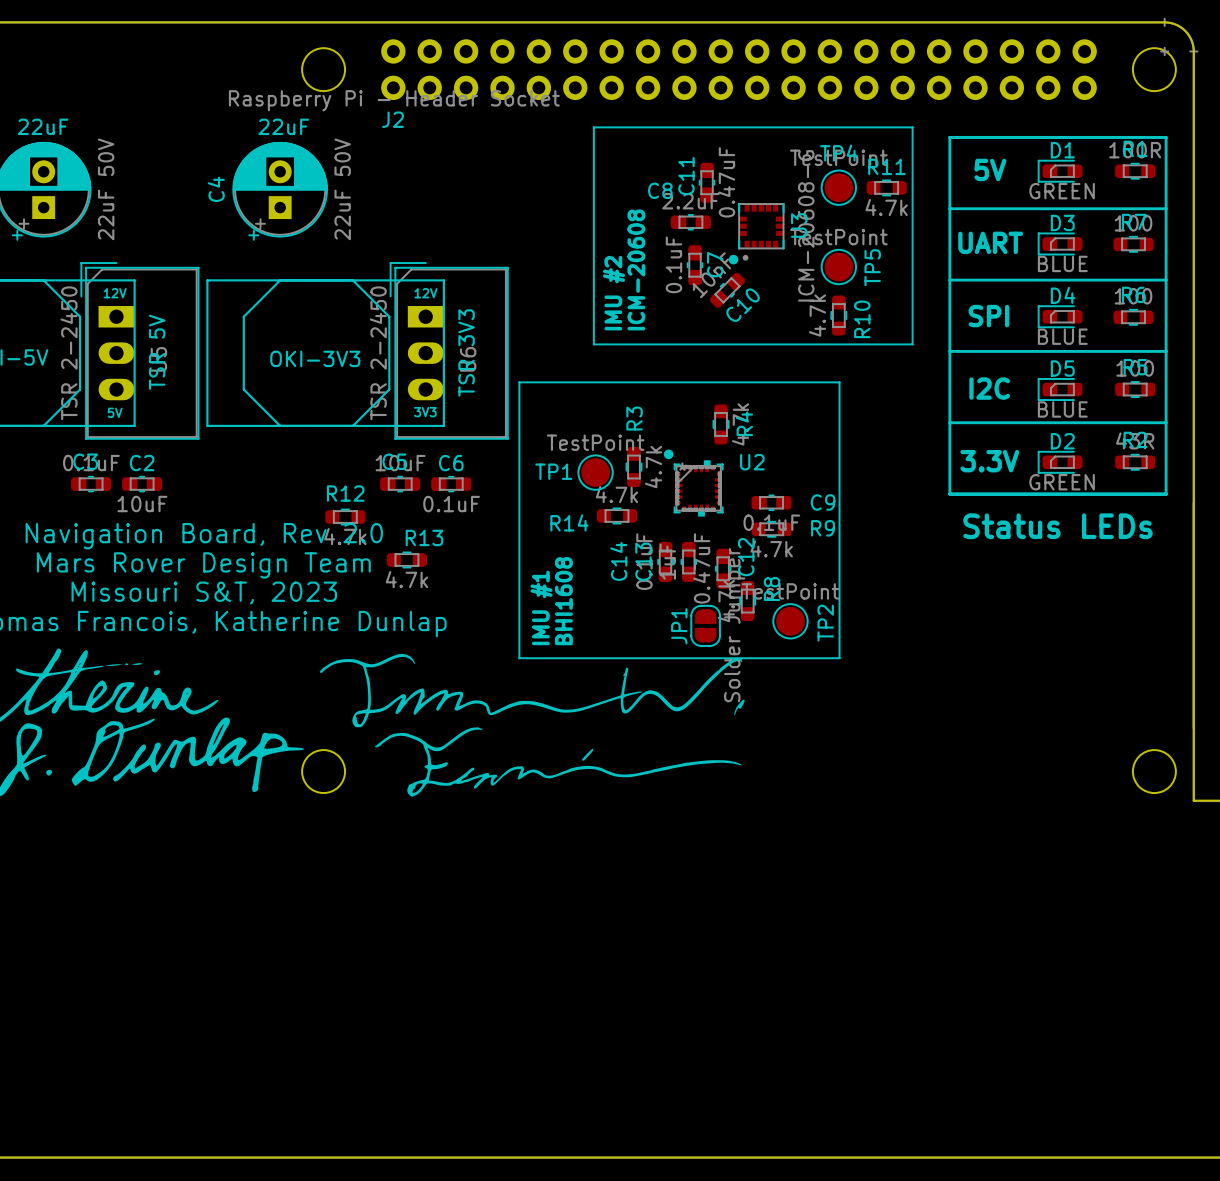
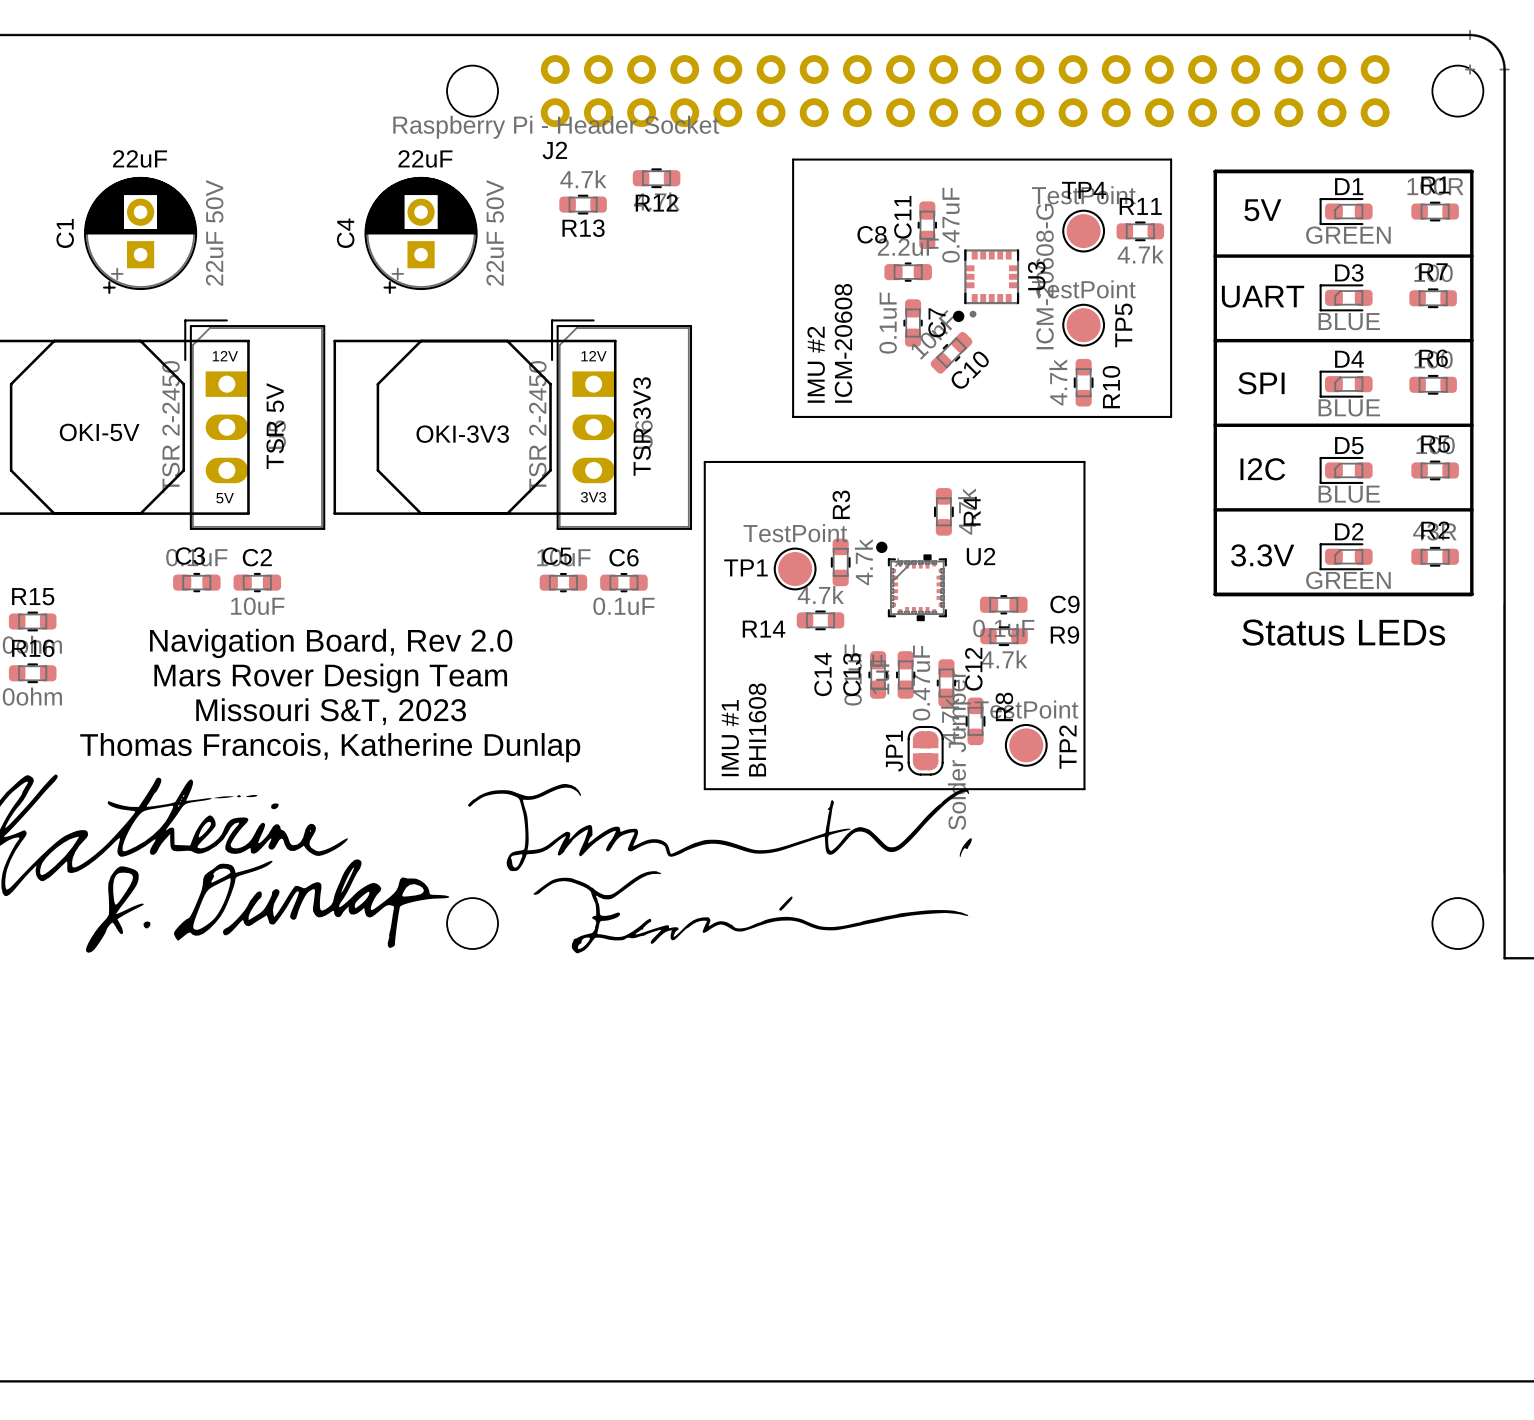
R12 name position: R12 (345, 493) -> R12 (656, 202)
R12 position: (345, 517) -> (656, 178)
R13 name position: R13 (424, 537) -> R13 (583, 228)
R13 position: (406, 559) -> (583, 204)
R13 value position: 4.7k (406, 579) -> 4.7k (583, 179)

